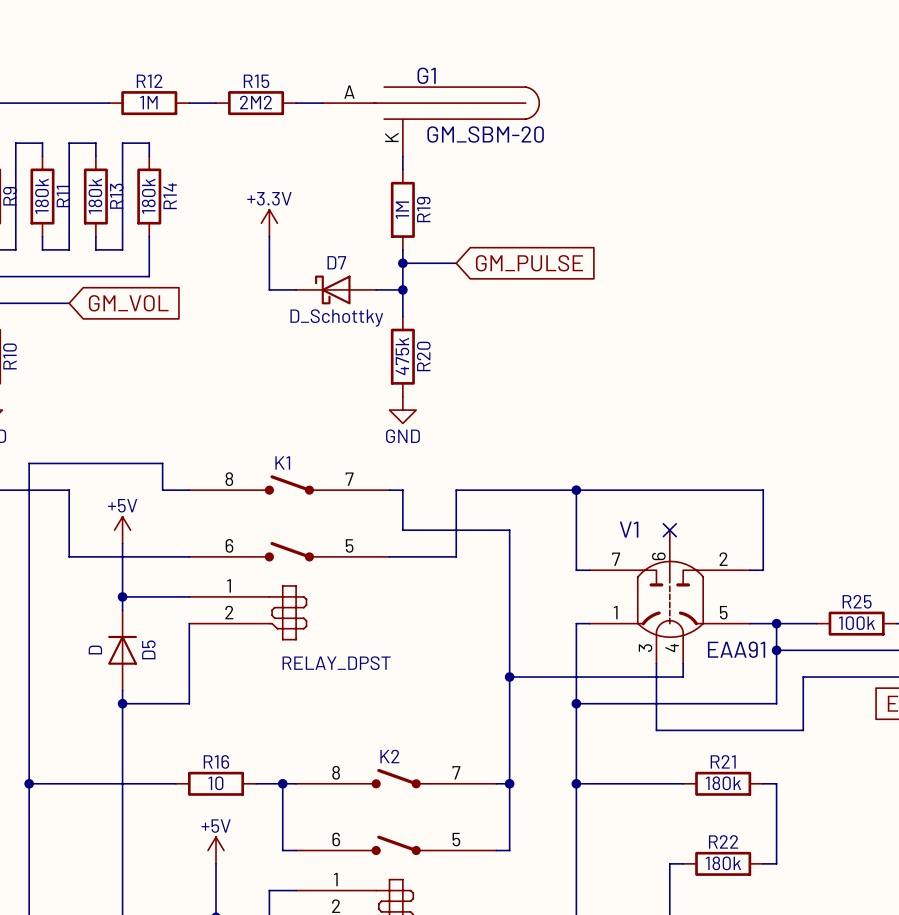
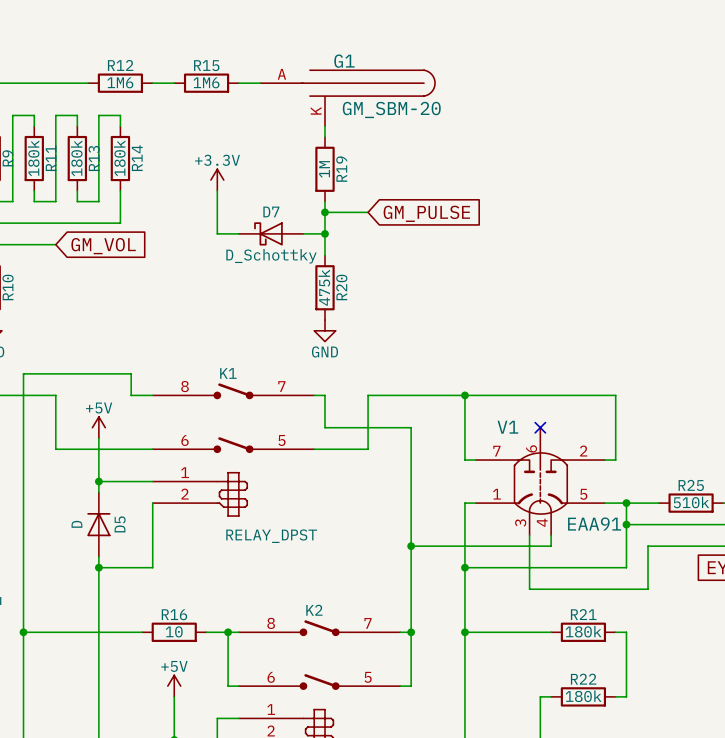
R12 value: 1M (148, 102) -> 1M6 (120, 82)
R15 value: 2M2 (256, 102) -> 1M6 (206, 82)
R25 value: 100k (856, 623) -> 510k (691, 502)

